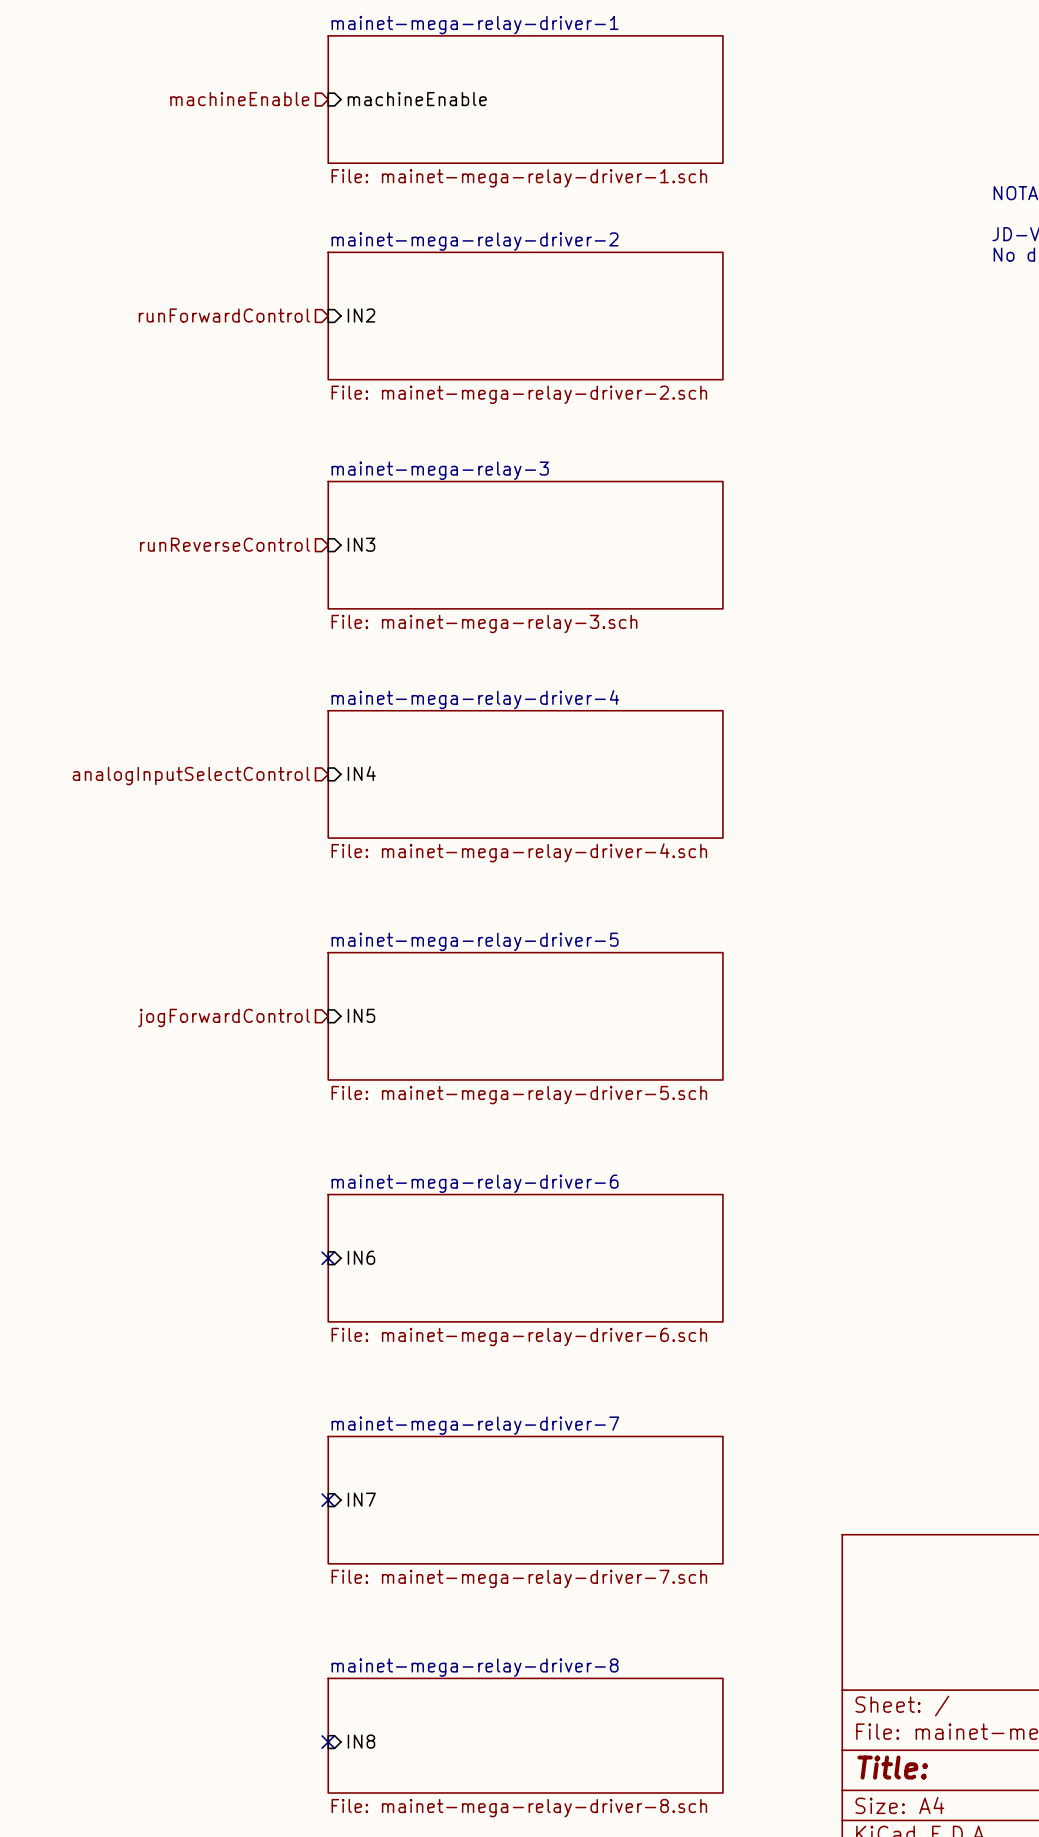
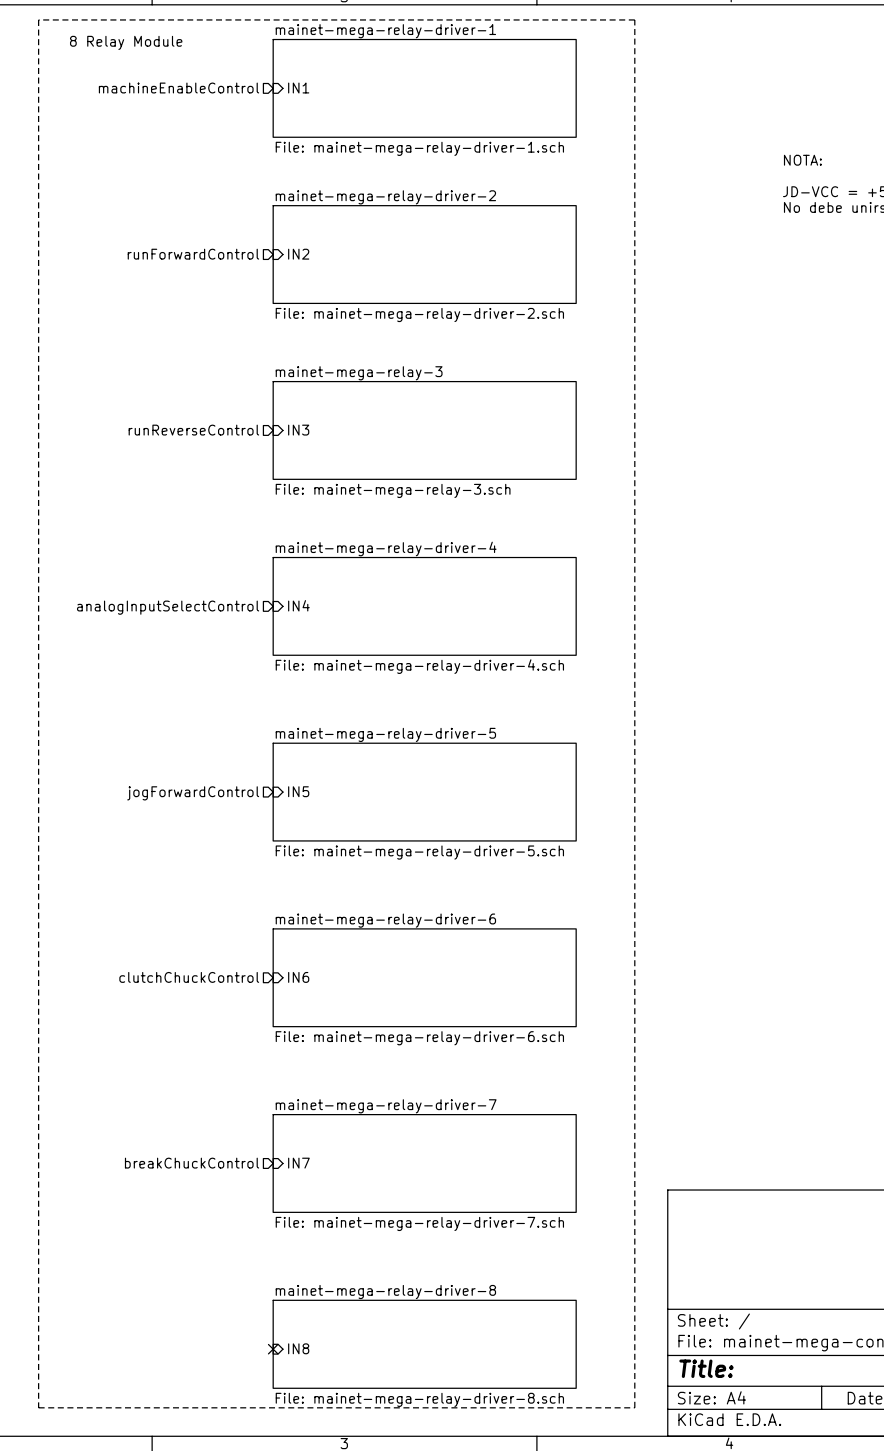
line: none -> (38, 19) (38, 1407) (634, 1407) (634, 19) (38, 19)
text: none -> 8 Relay Module (126, 42)
hierarchical label: machineEnable (239, 99) -> machineEnableControl (179, 88)
sheet pin: machineEnable (417, 99) -> IN1 (298, 88)
hierarchical label: none -> clutchChuckControl (189, 977)
no-connect mark: (328, 1258) -> none
hierarchical label: none -> breakChuckControl (192, 1163)
no-connect mark: (328, 1500) -> none

